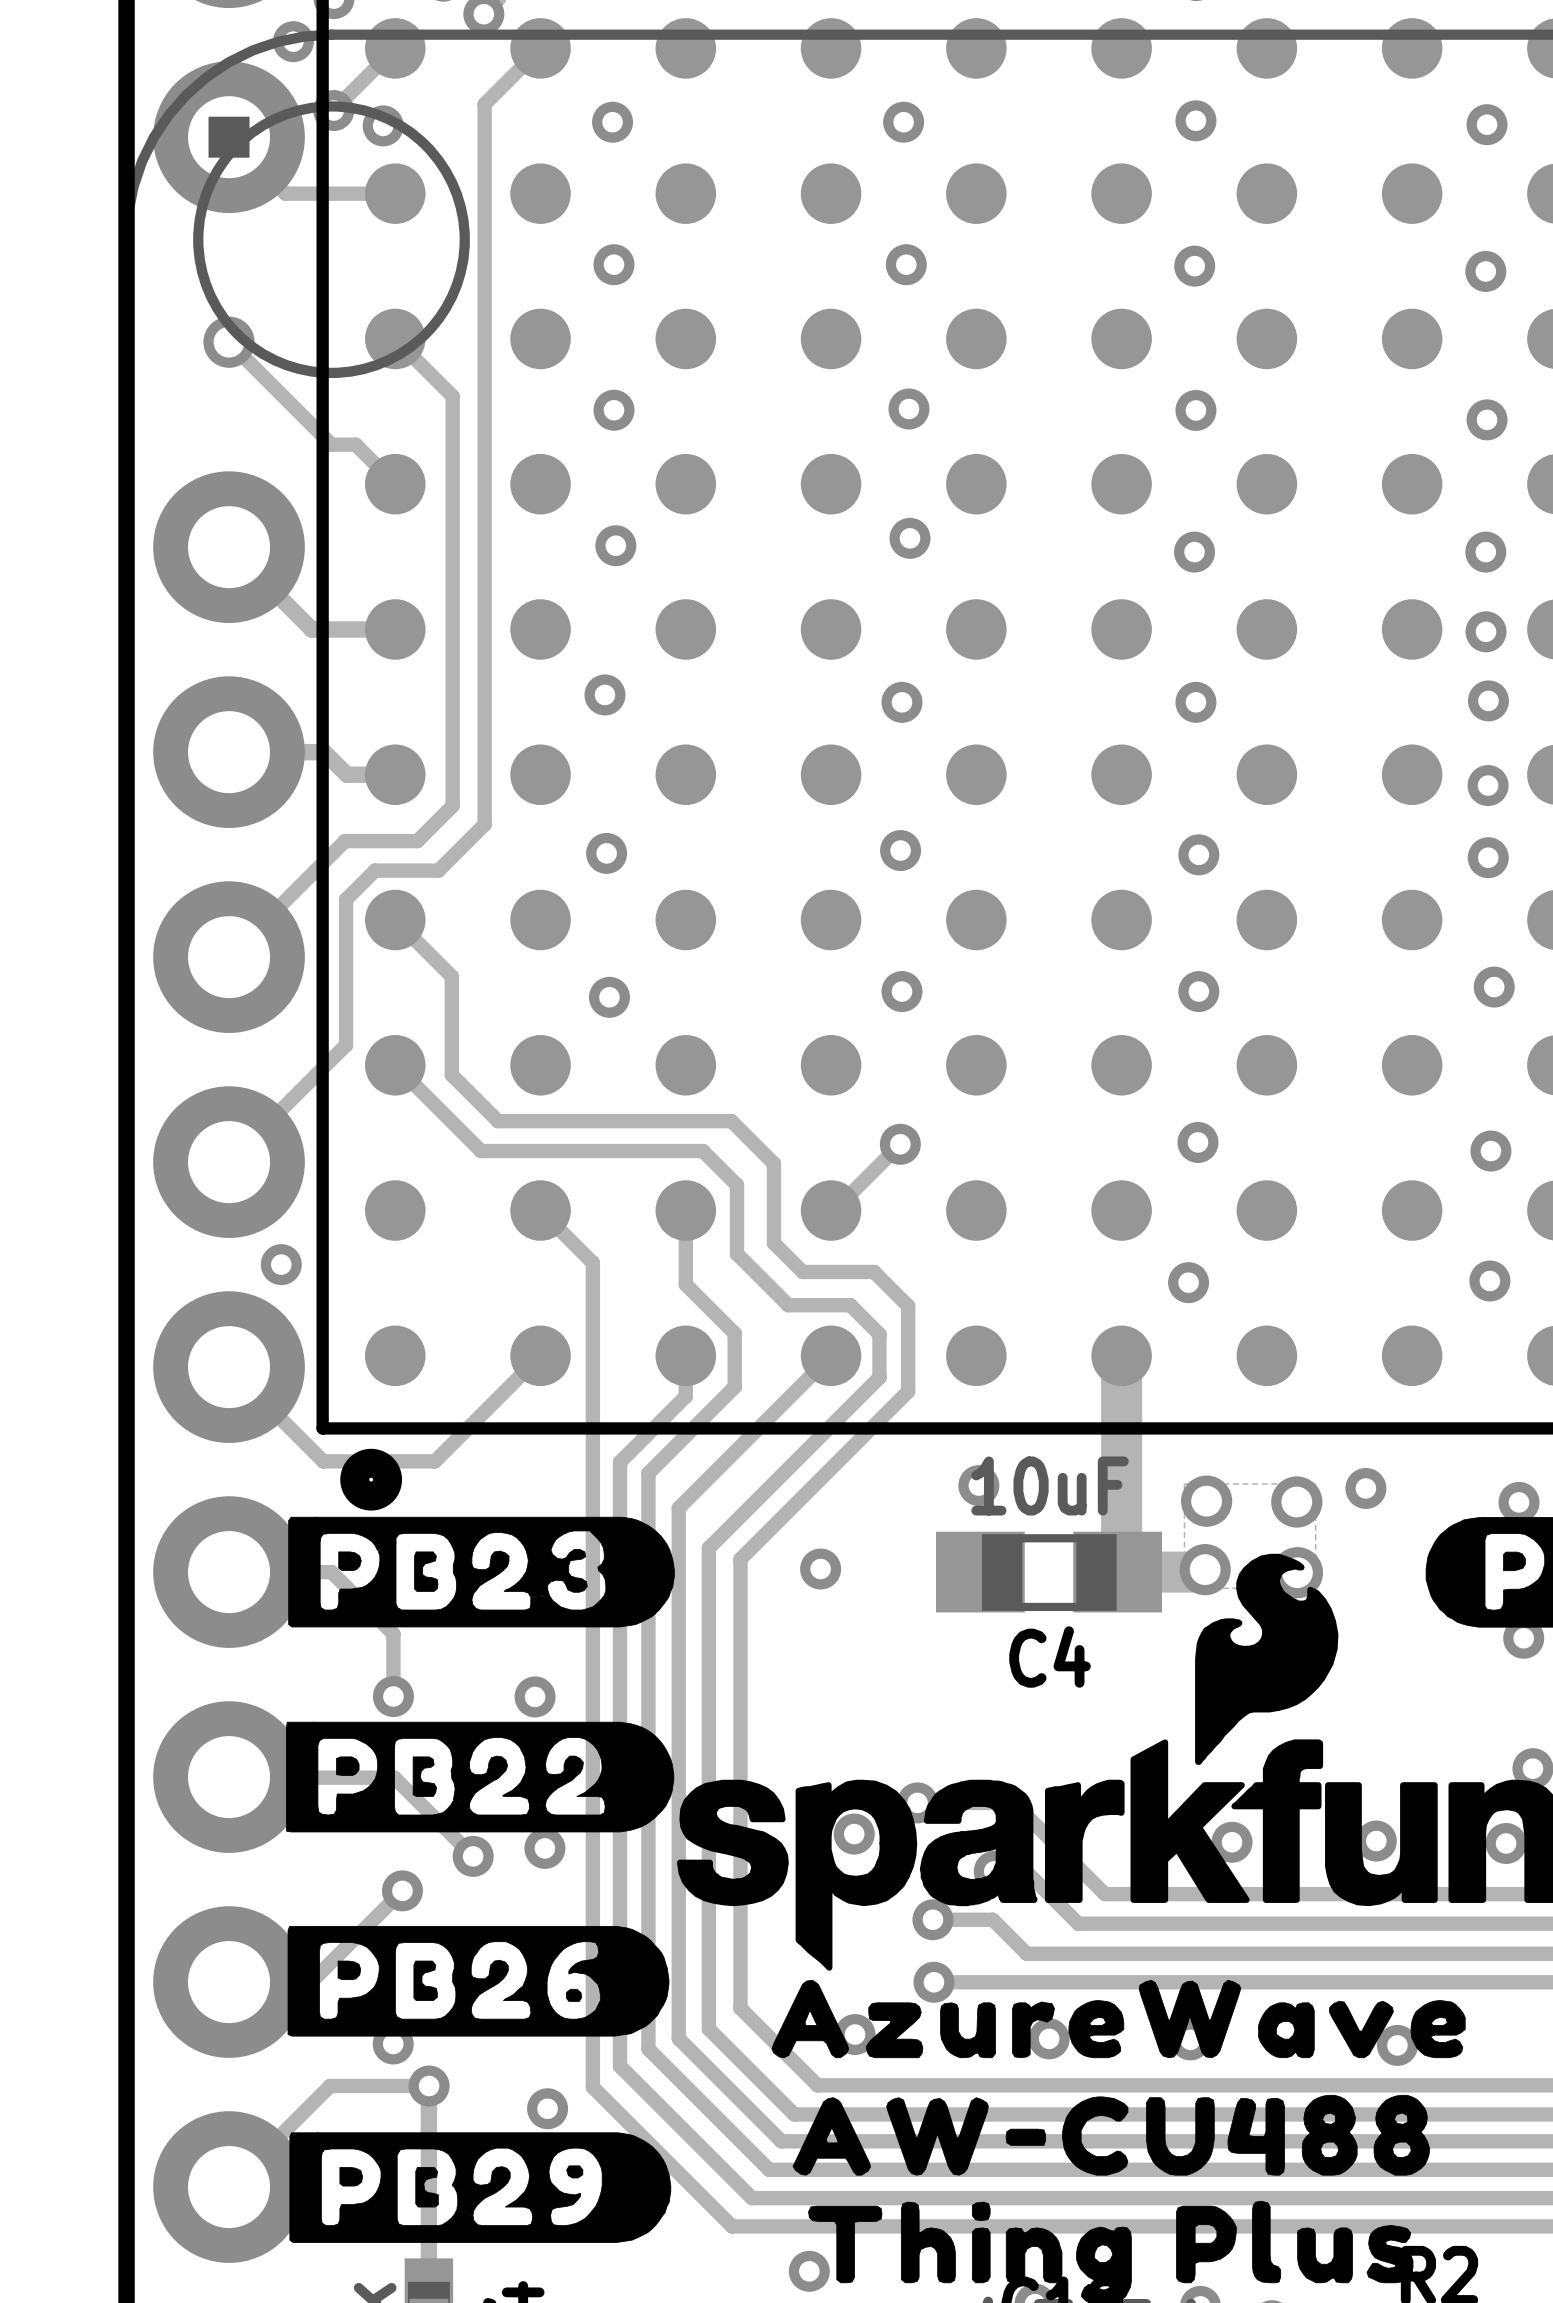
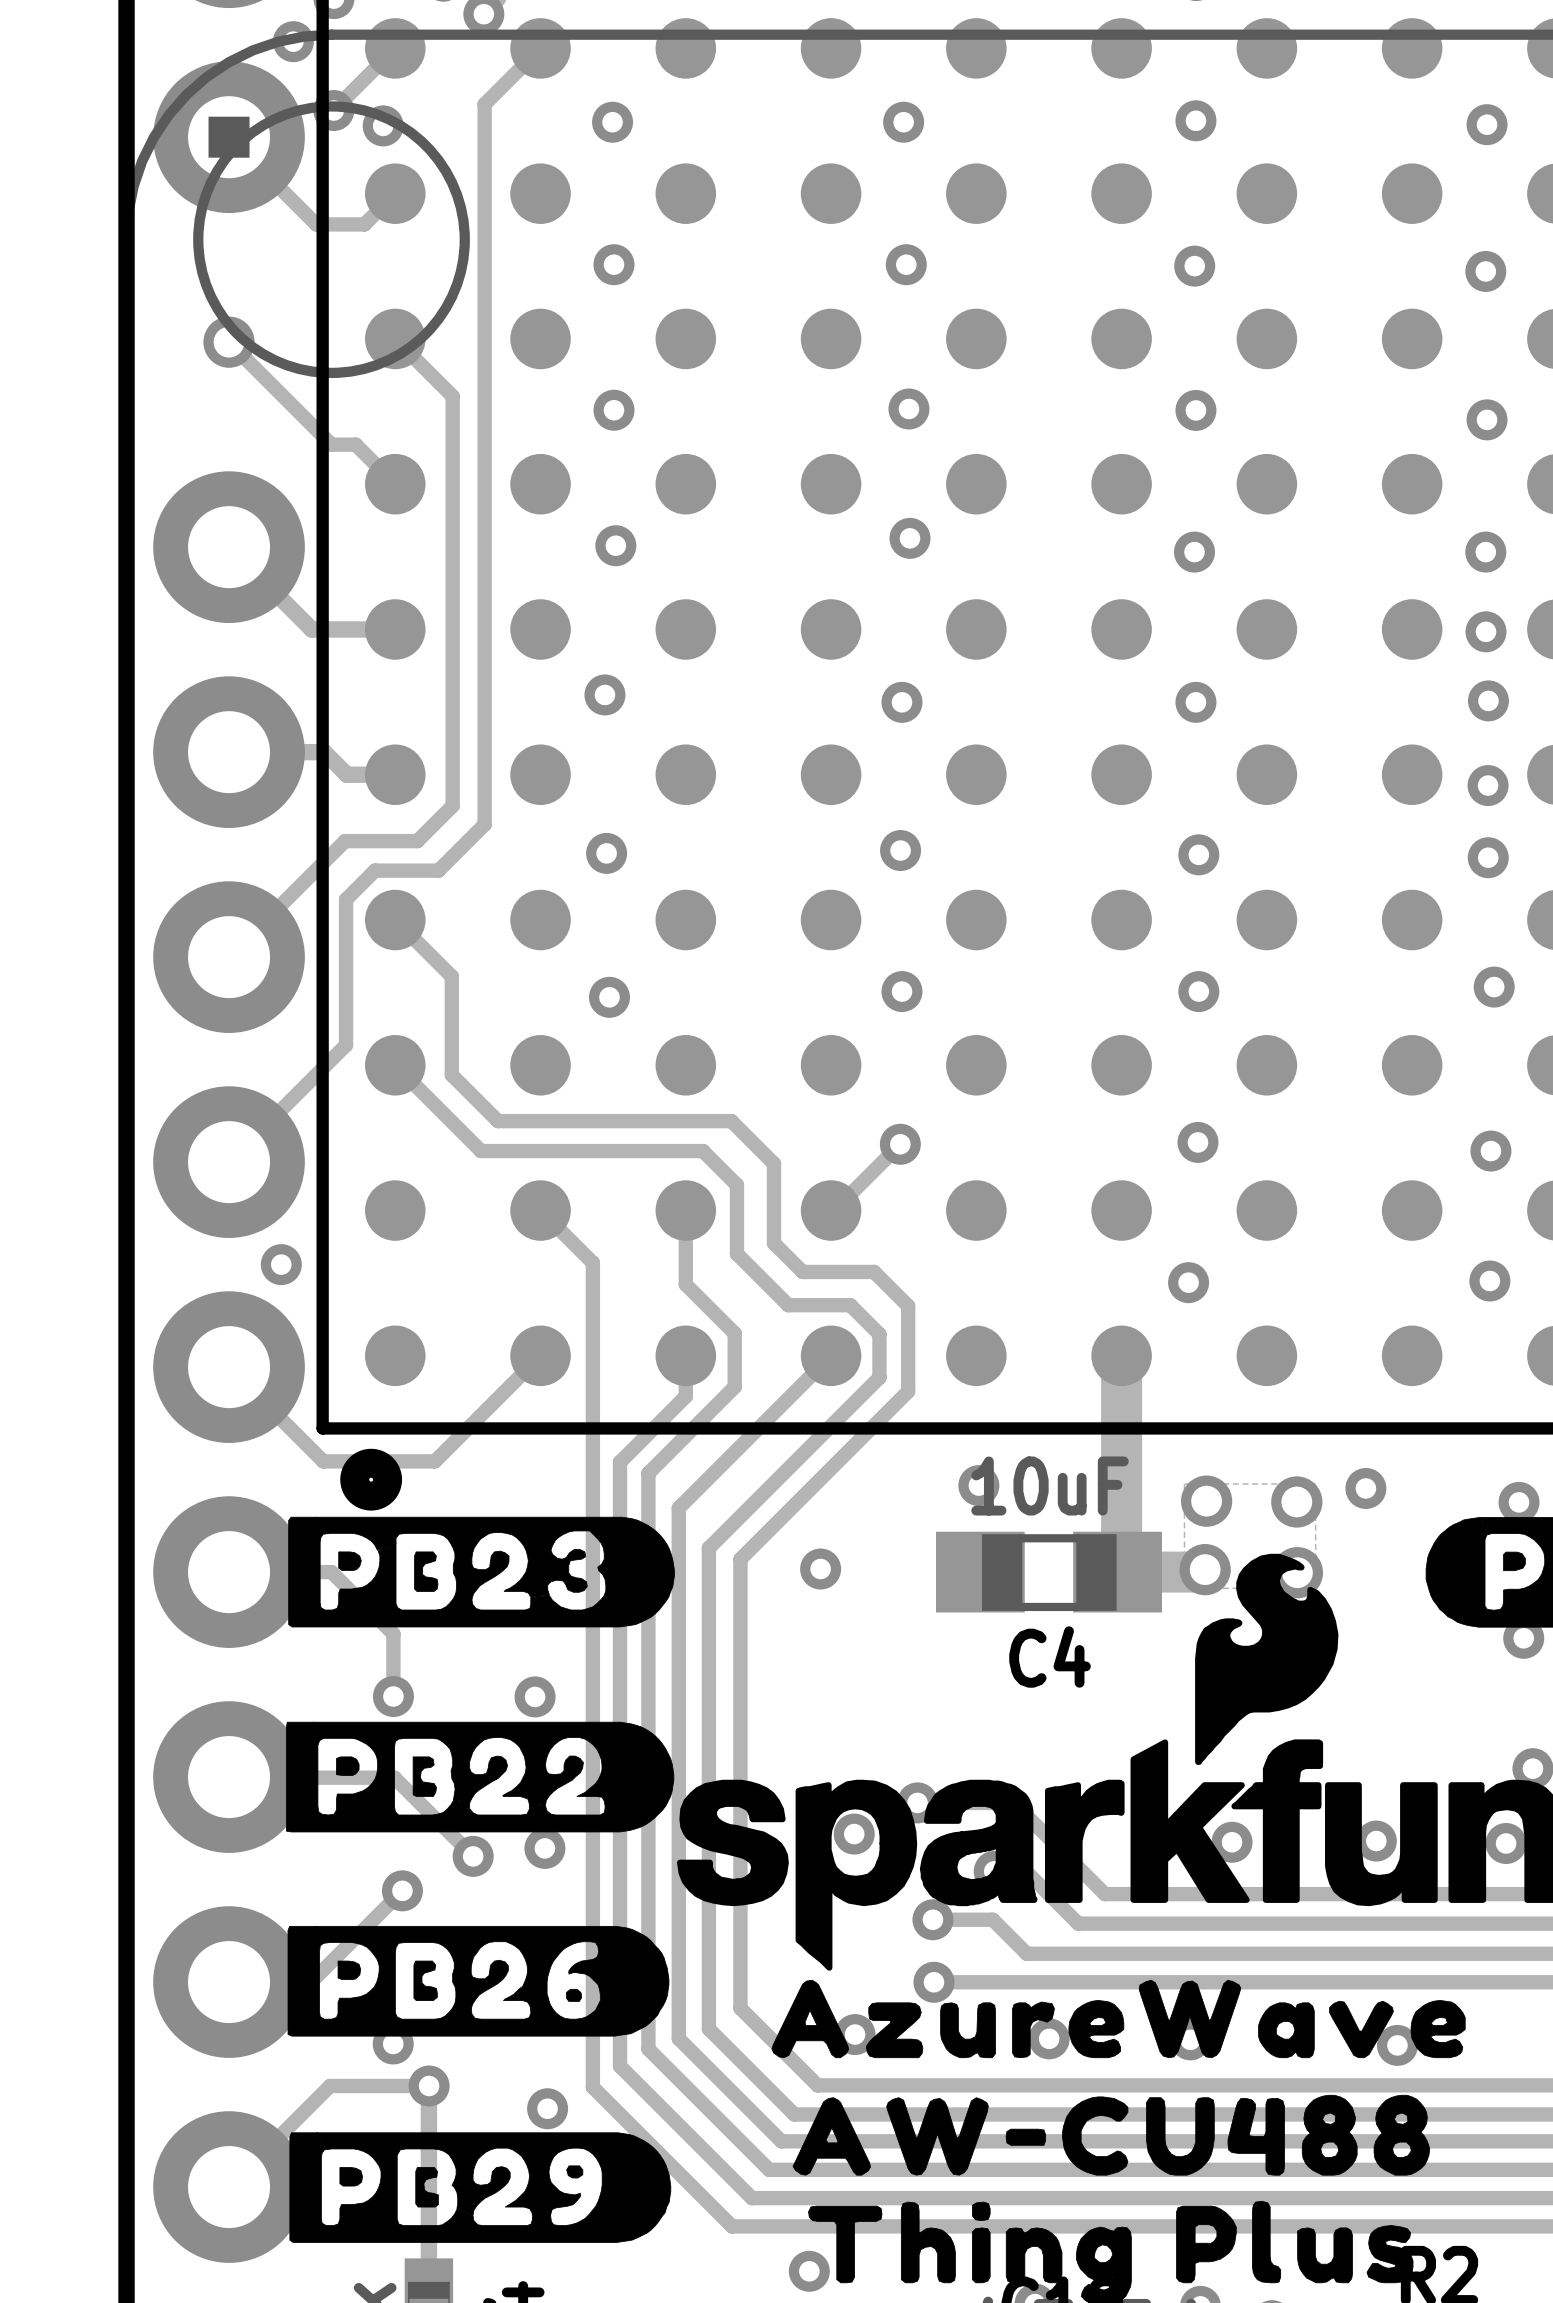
track: (285, 193) (395, 193) -> (285, 193) (316, 224) (364, 224) (395, 193)

